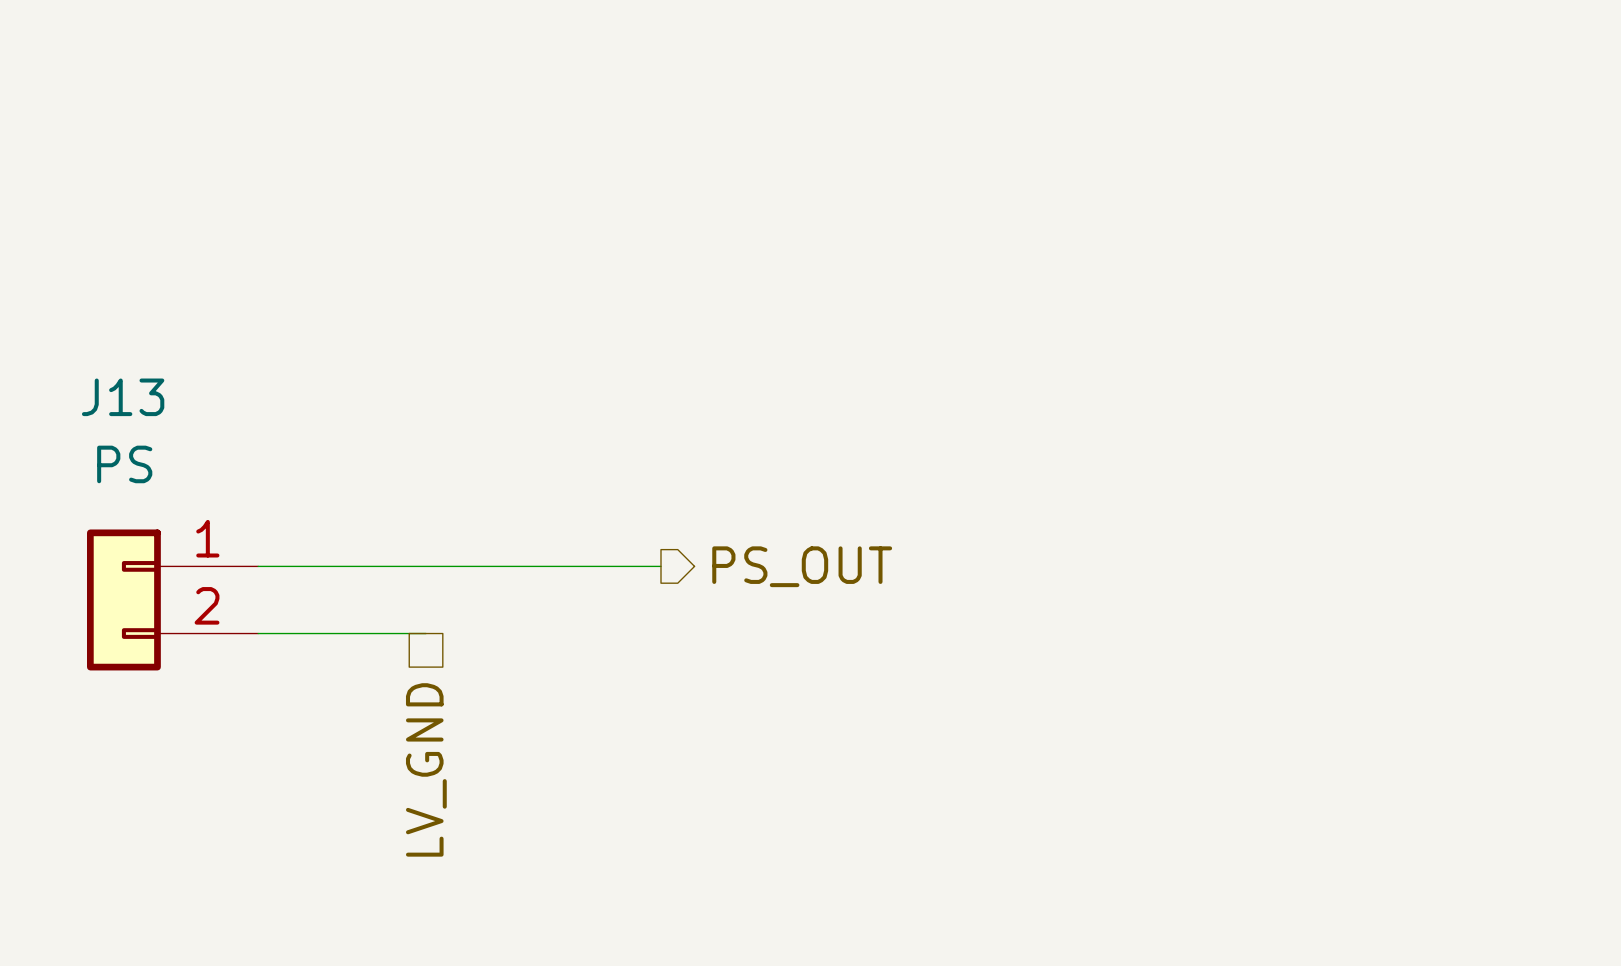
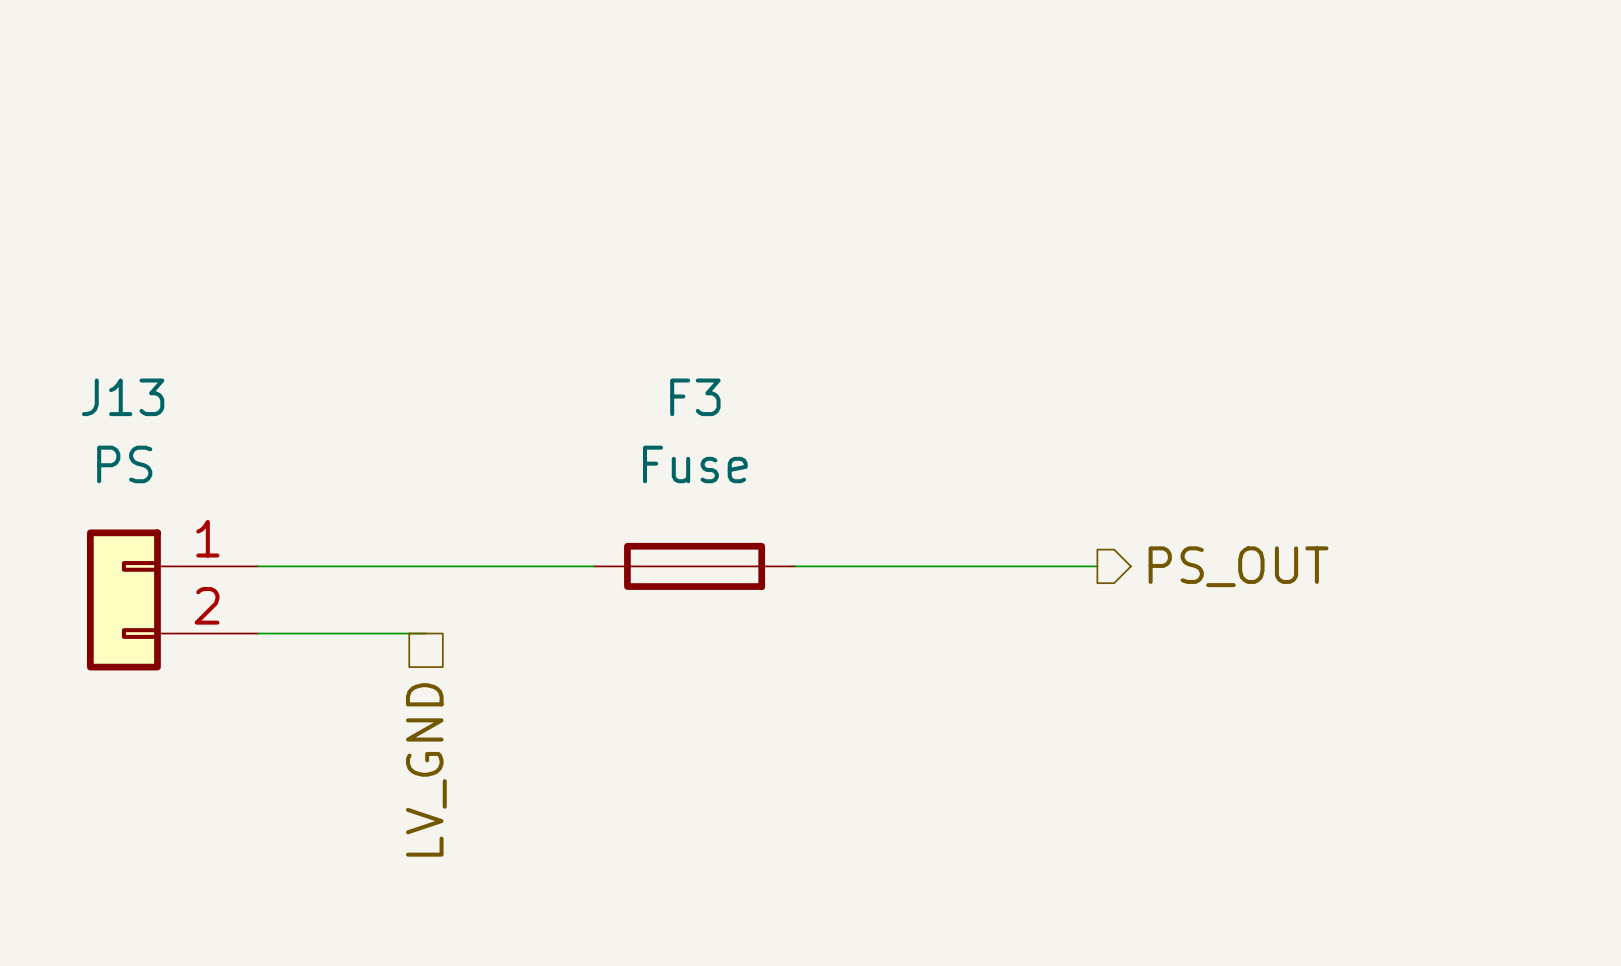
F3: none -> Fuse (694, 566)
wire: none -> (795, 566) (1097, 566)
hierarchical label position: PS_OUT (802, 566) -> PS_OUT (1238, 566)

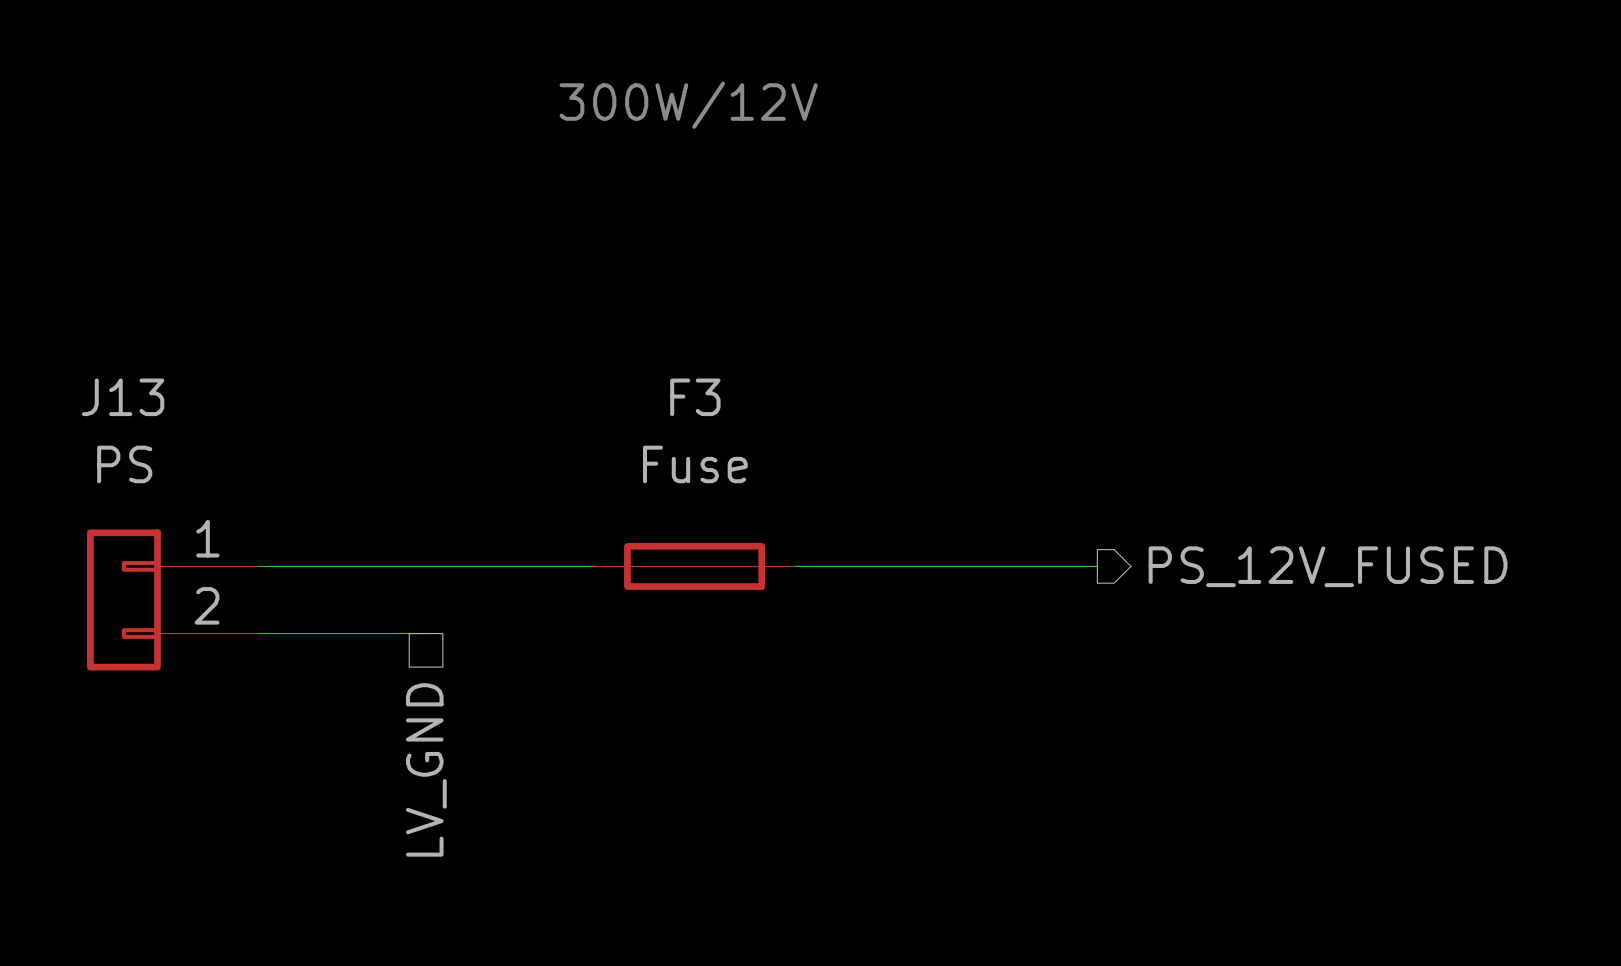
text: none -> 300W/12V (688, 105)
hierarchical label: PS_OUT (1238, 566) -> PS_12V_FUSED (1328, 566)

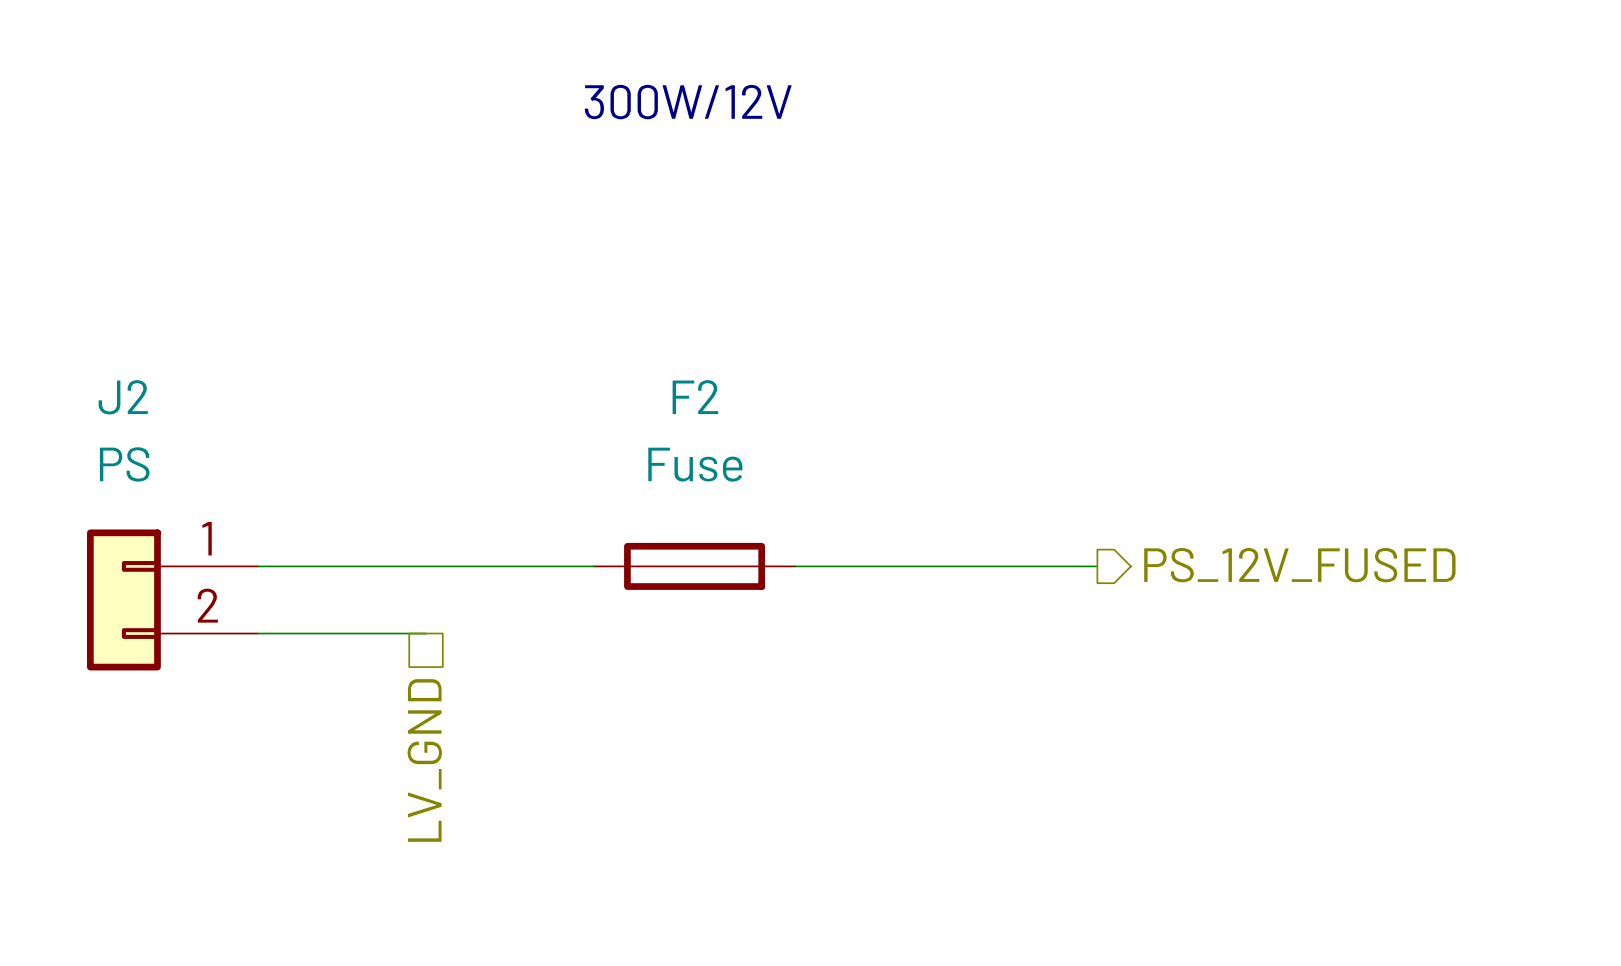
J13 name: J13 (123, 397) -> J2 (123, 397)
F3 name: F3 (695, 397) -> F2 (695, 397)

